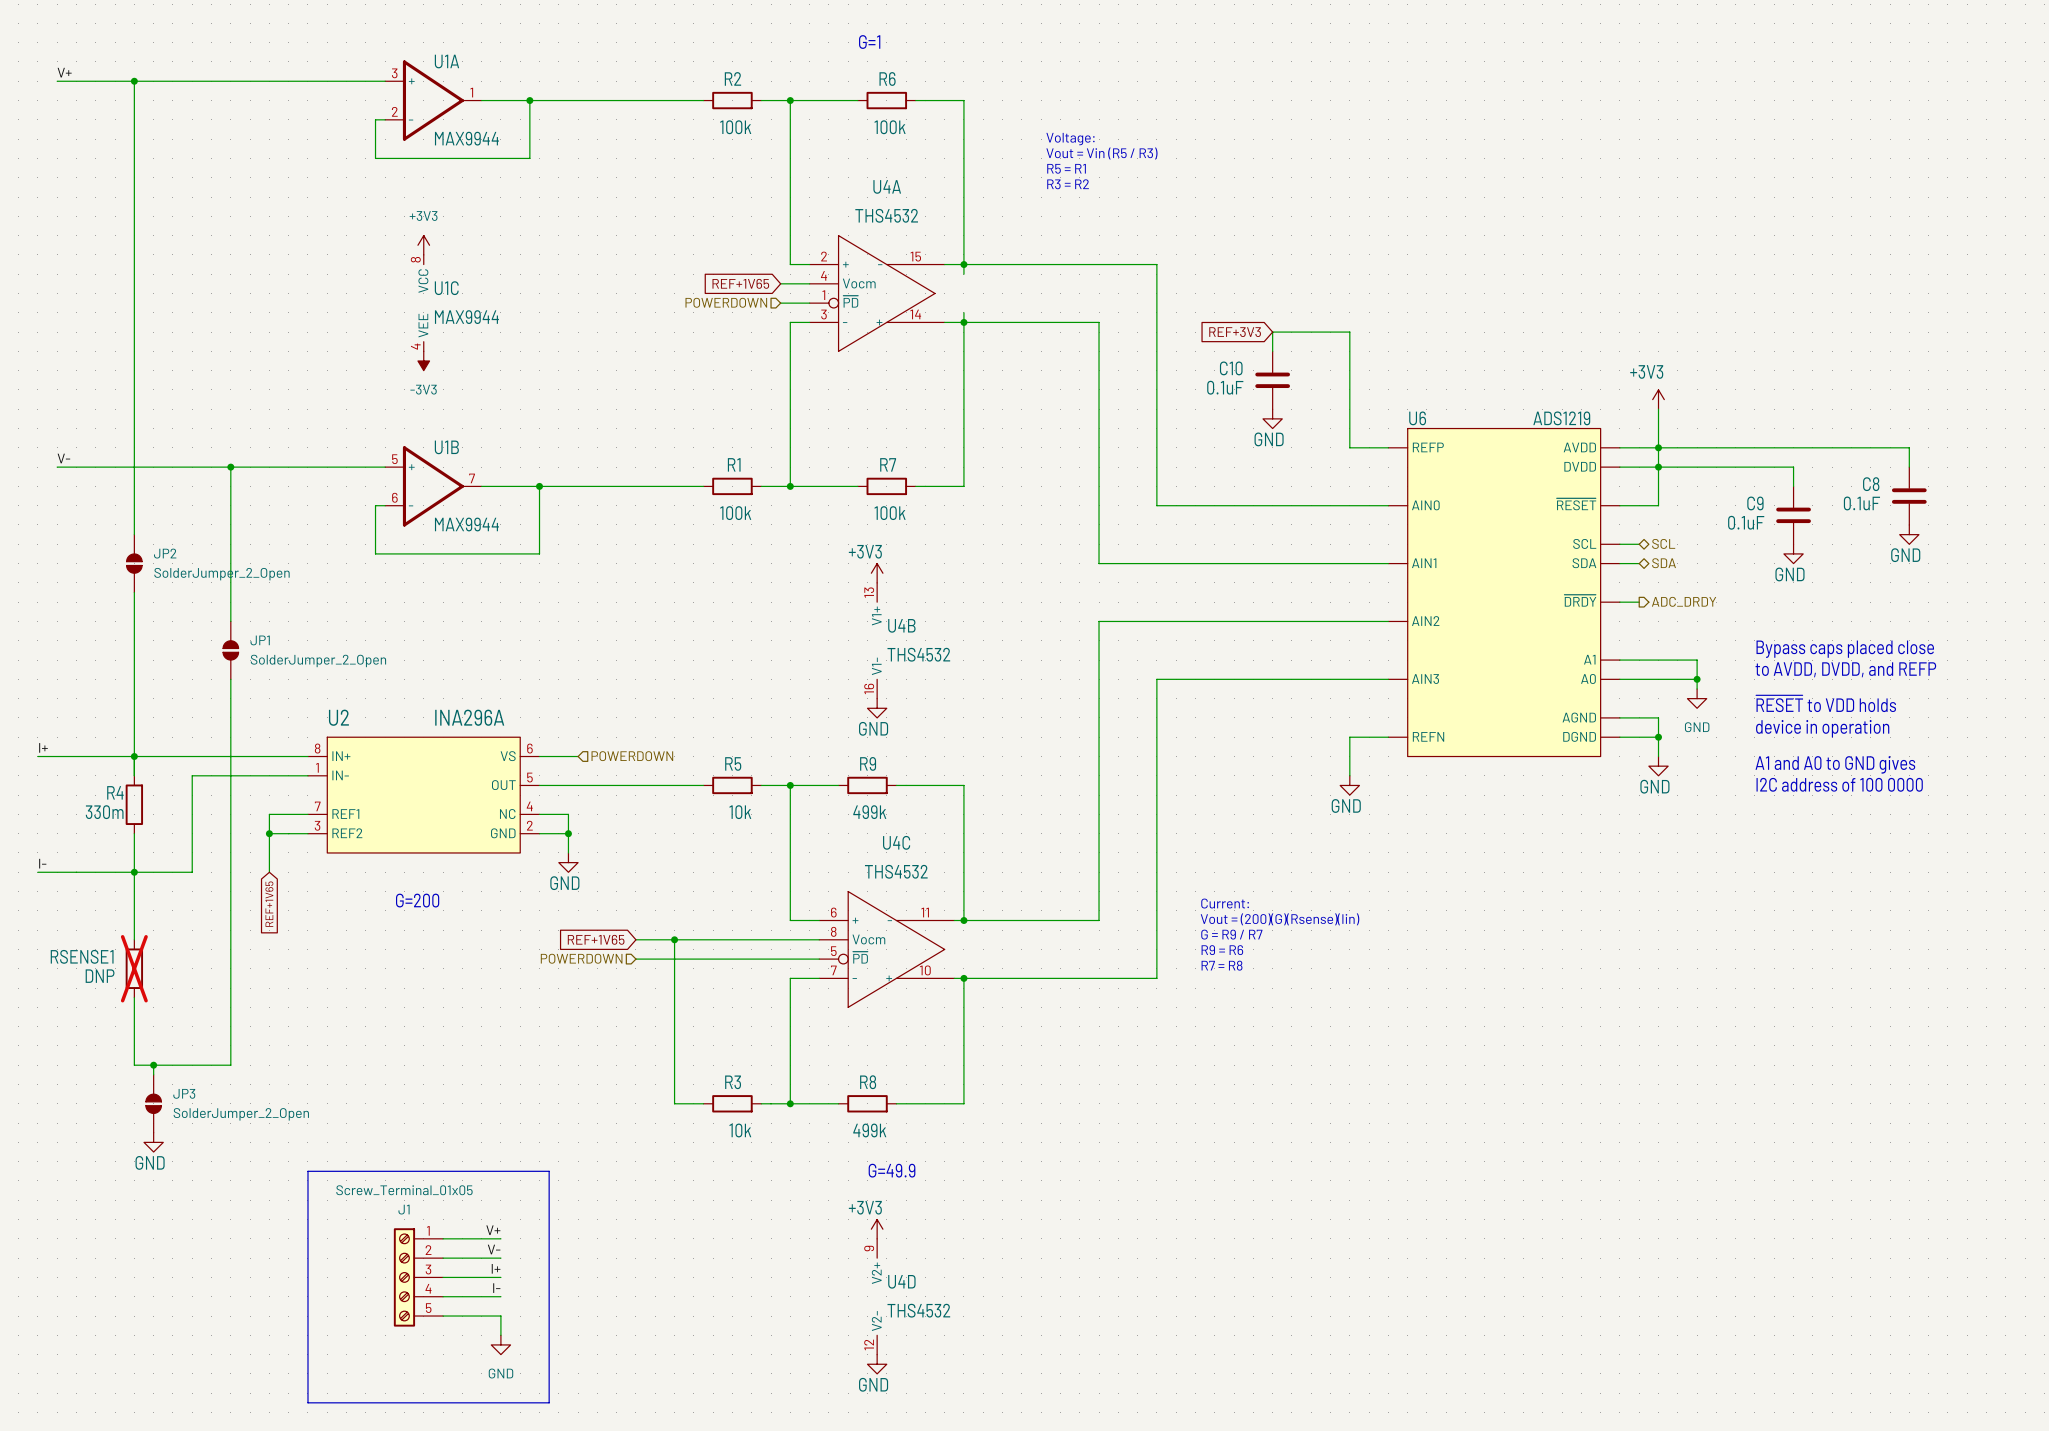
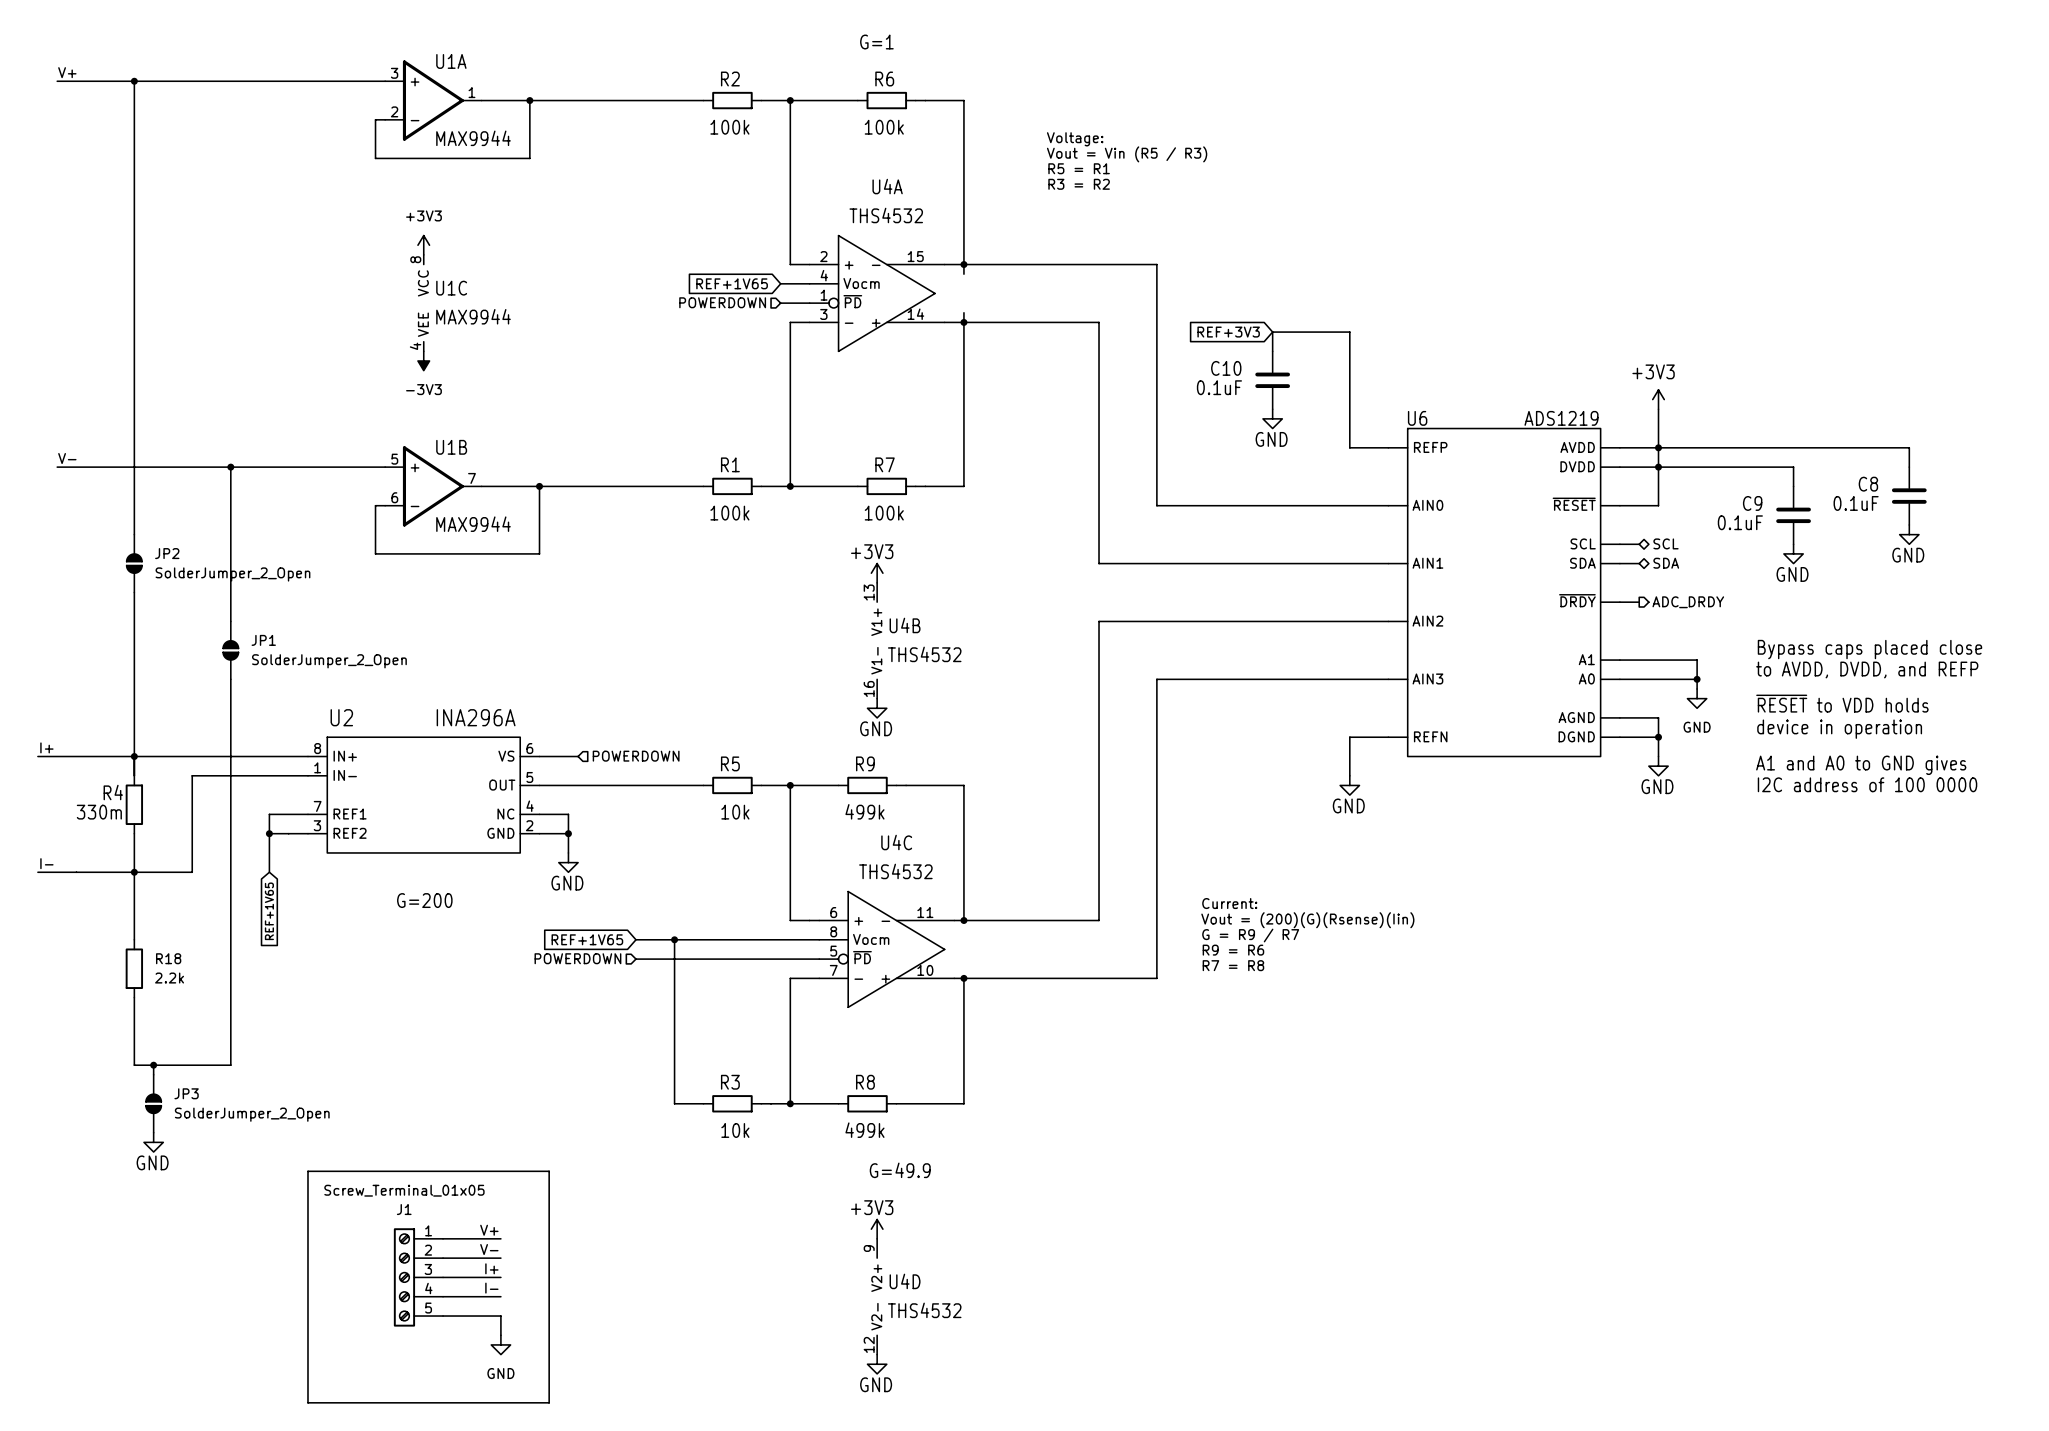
RSENSE1 name: RSENSE1 (82, 956) -> R18 (168, 958)
RSENSE1 do-not-place cross: (134, 968) -> none
RSENSE1 value: DNP (100, 976) -> 2.2k (169, 978)

